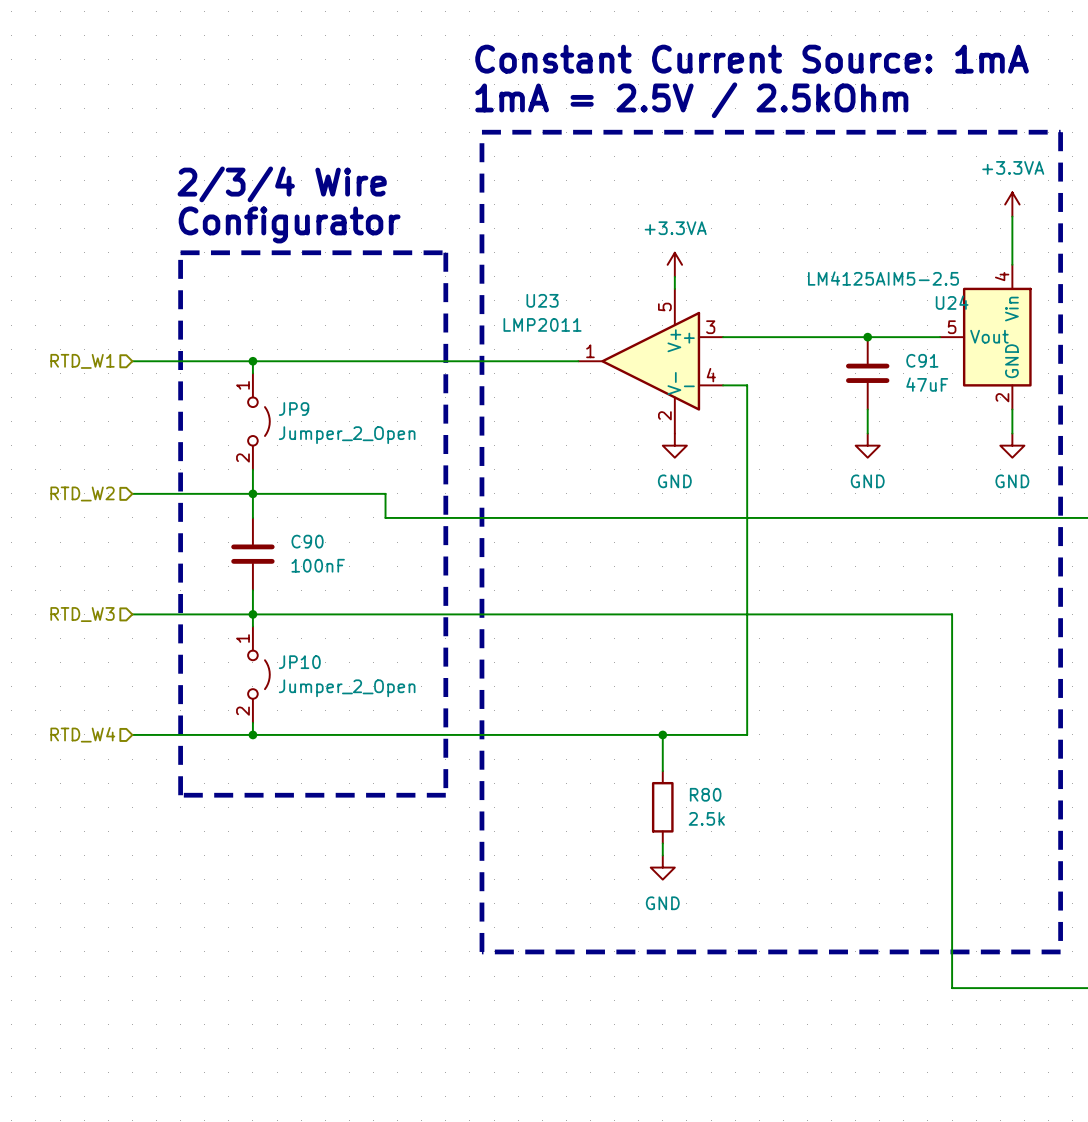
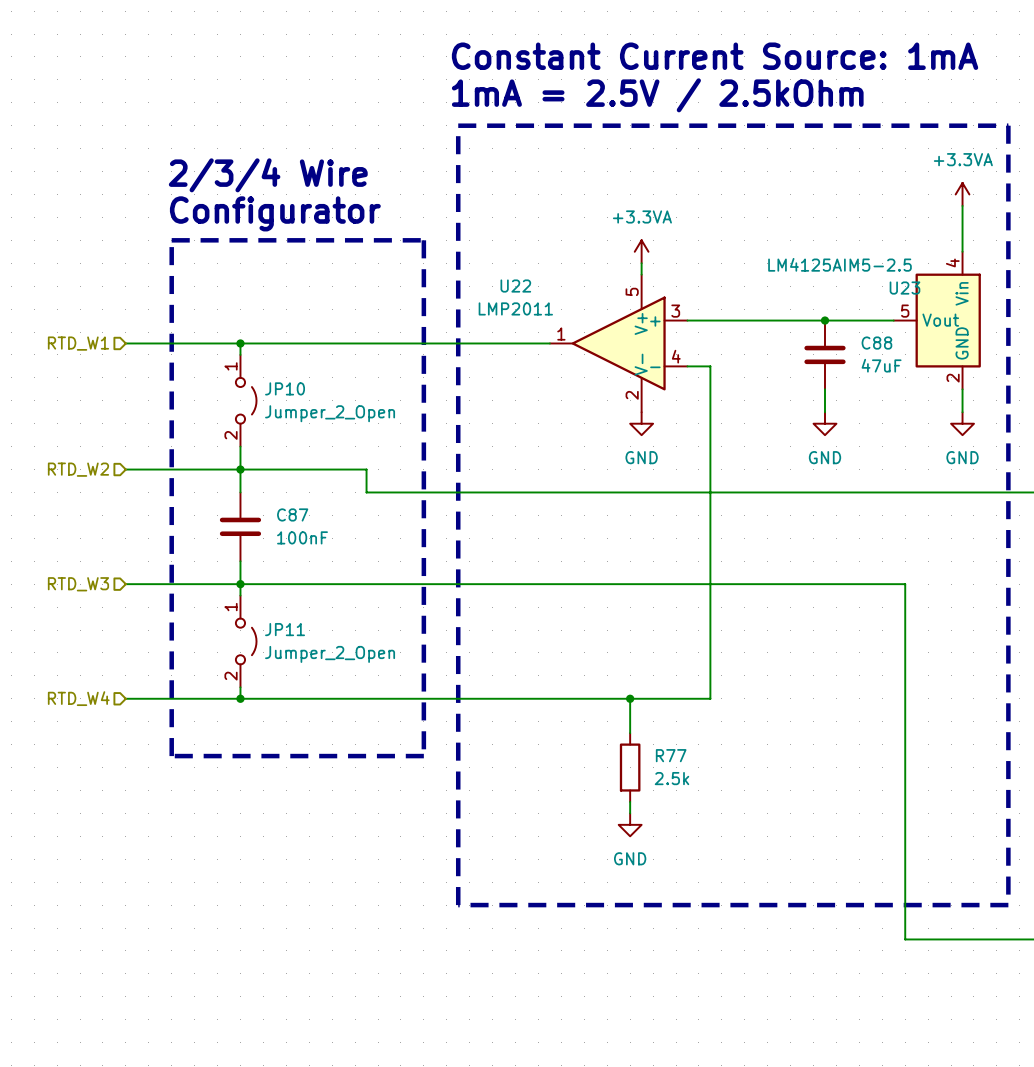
U23 name: U23 (542, 300) -> U22 (515, 286)
U24 name: U24 (952, 302) -> U23 (904, 288)
C91 name: C91 (922, 360) -> C88 (876, 343)
JP9 name: JP9 (294, 409) -> JP10 (285, 388)
C90 name: C90 (307, 541) -> C87 (292, 514)
JP10 name: JP10 (299, 662) -> JP11 (285, 629)
R80 name: R80 (705, 794) -> R77 (671, 755)

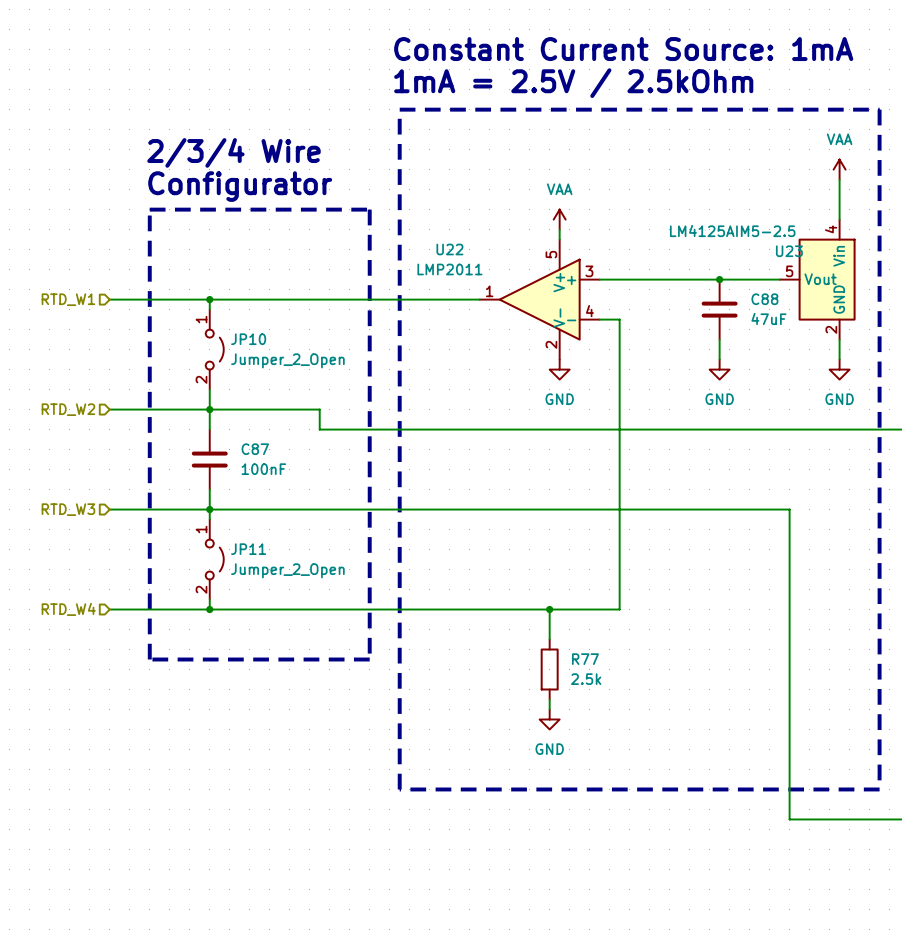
power symbol: +3.3VA (962, 194) -> VAA (839, 169)
power symbol: +3.3VA (641, 251) -> VAA (559, 219)

